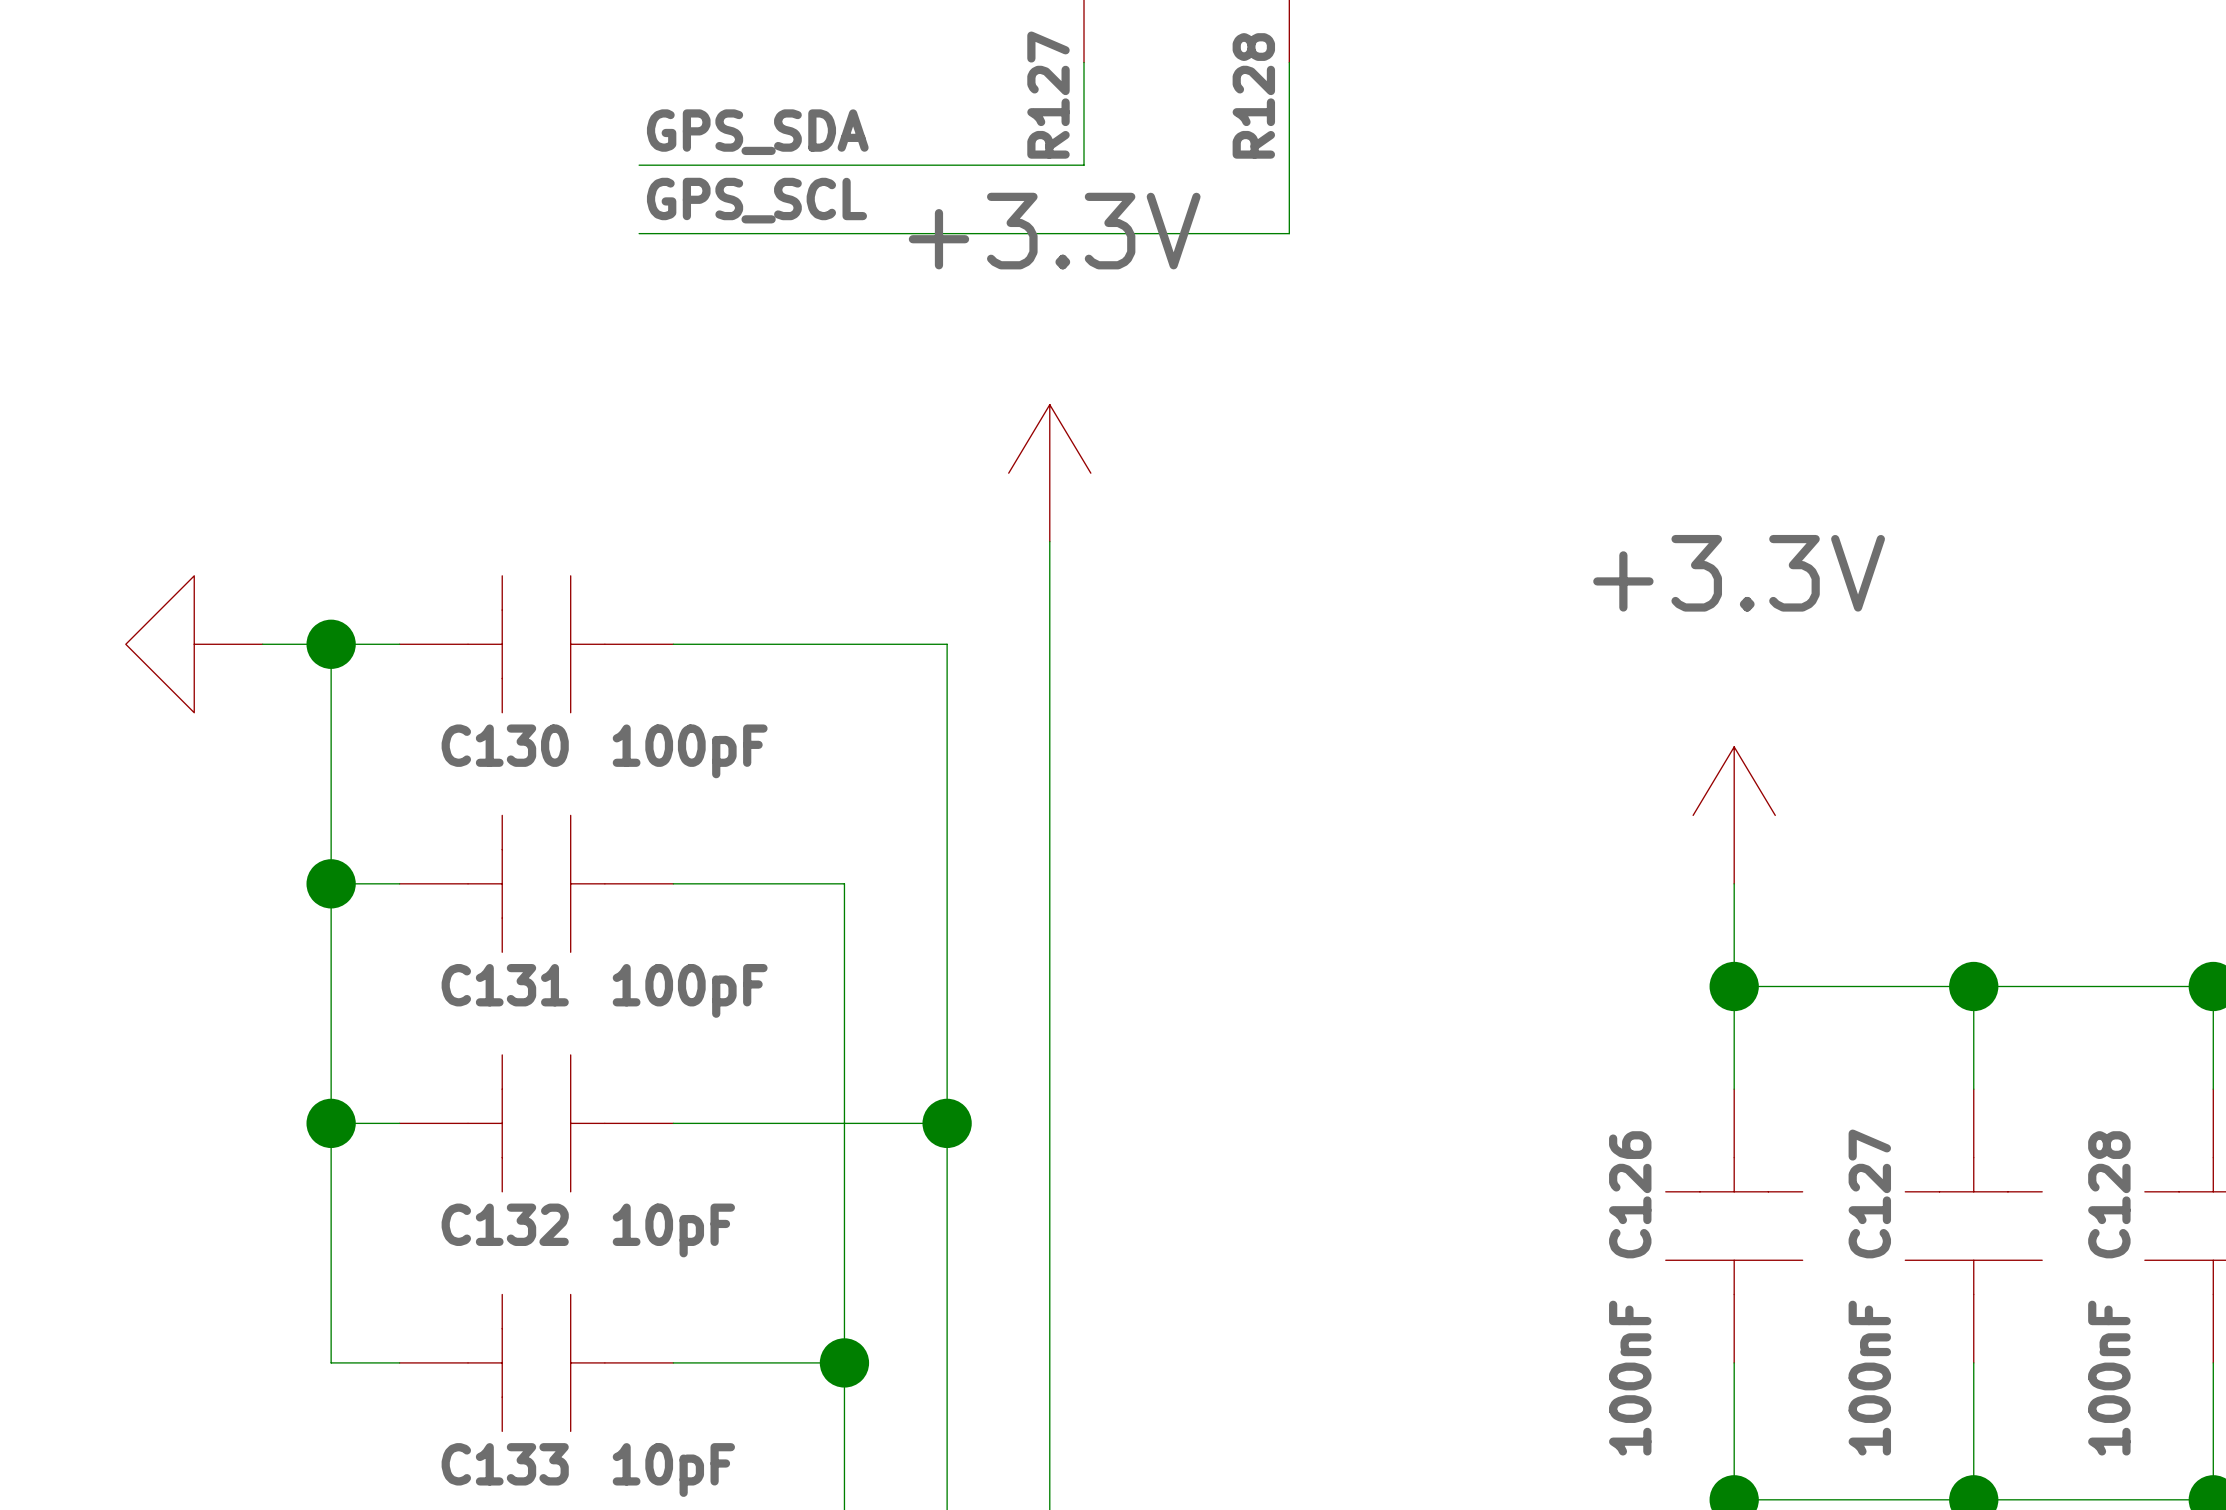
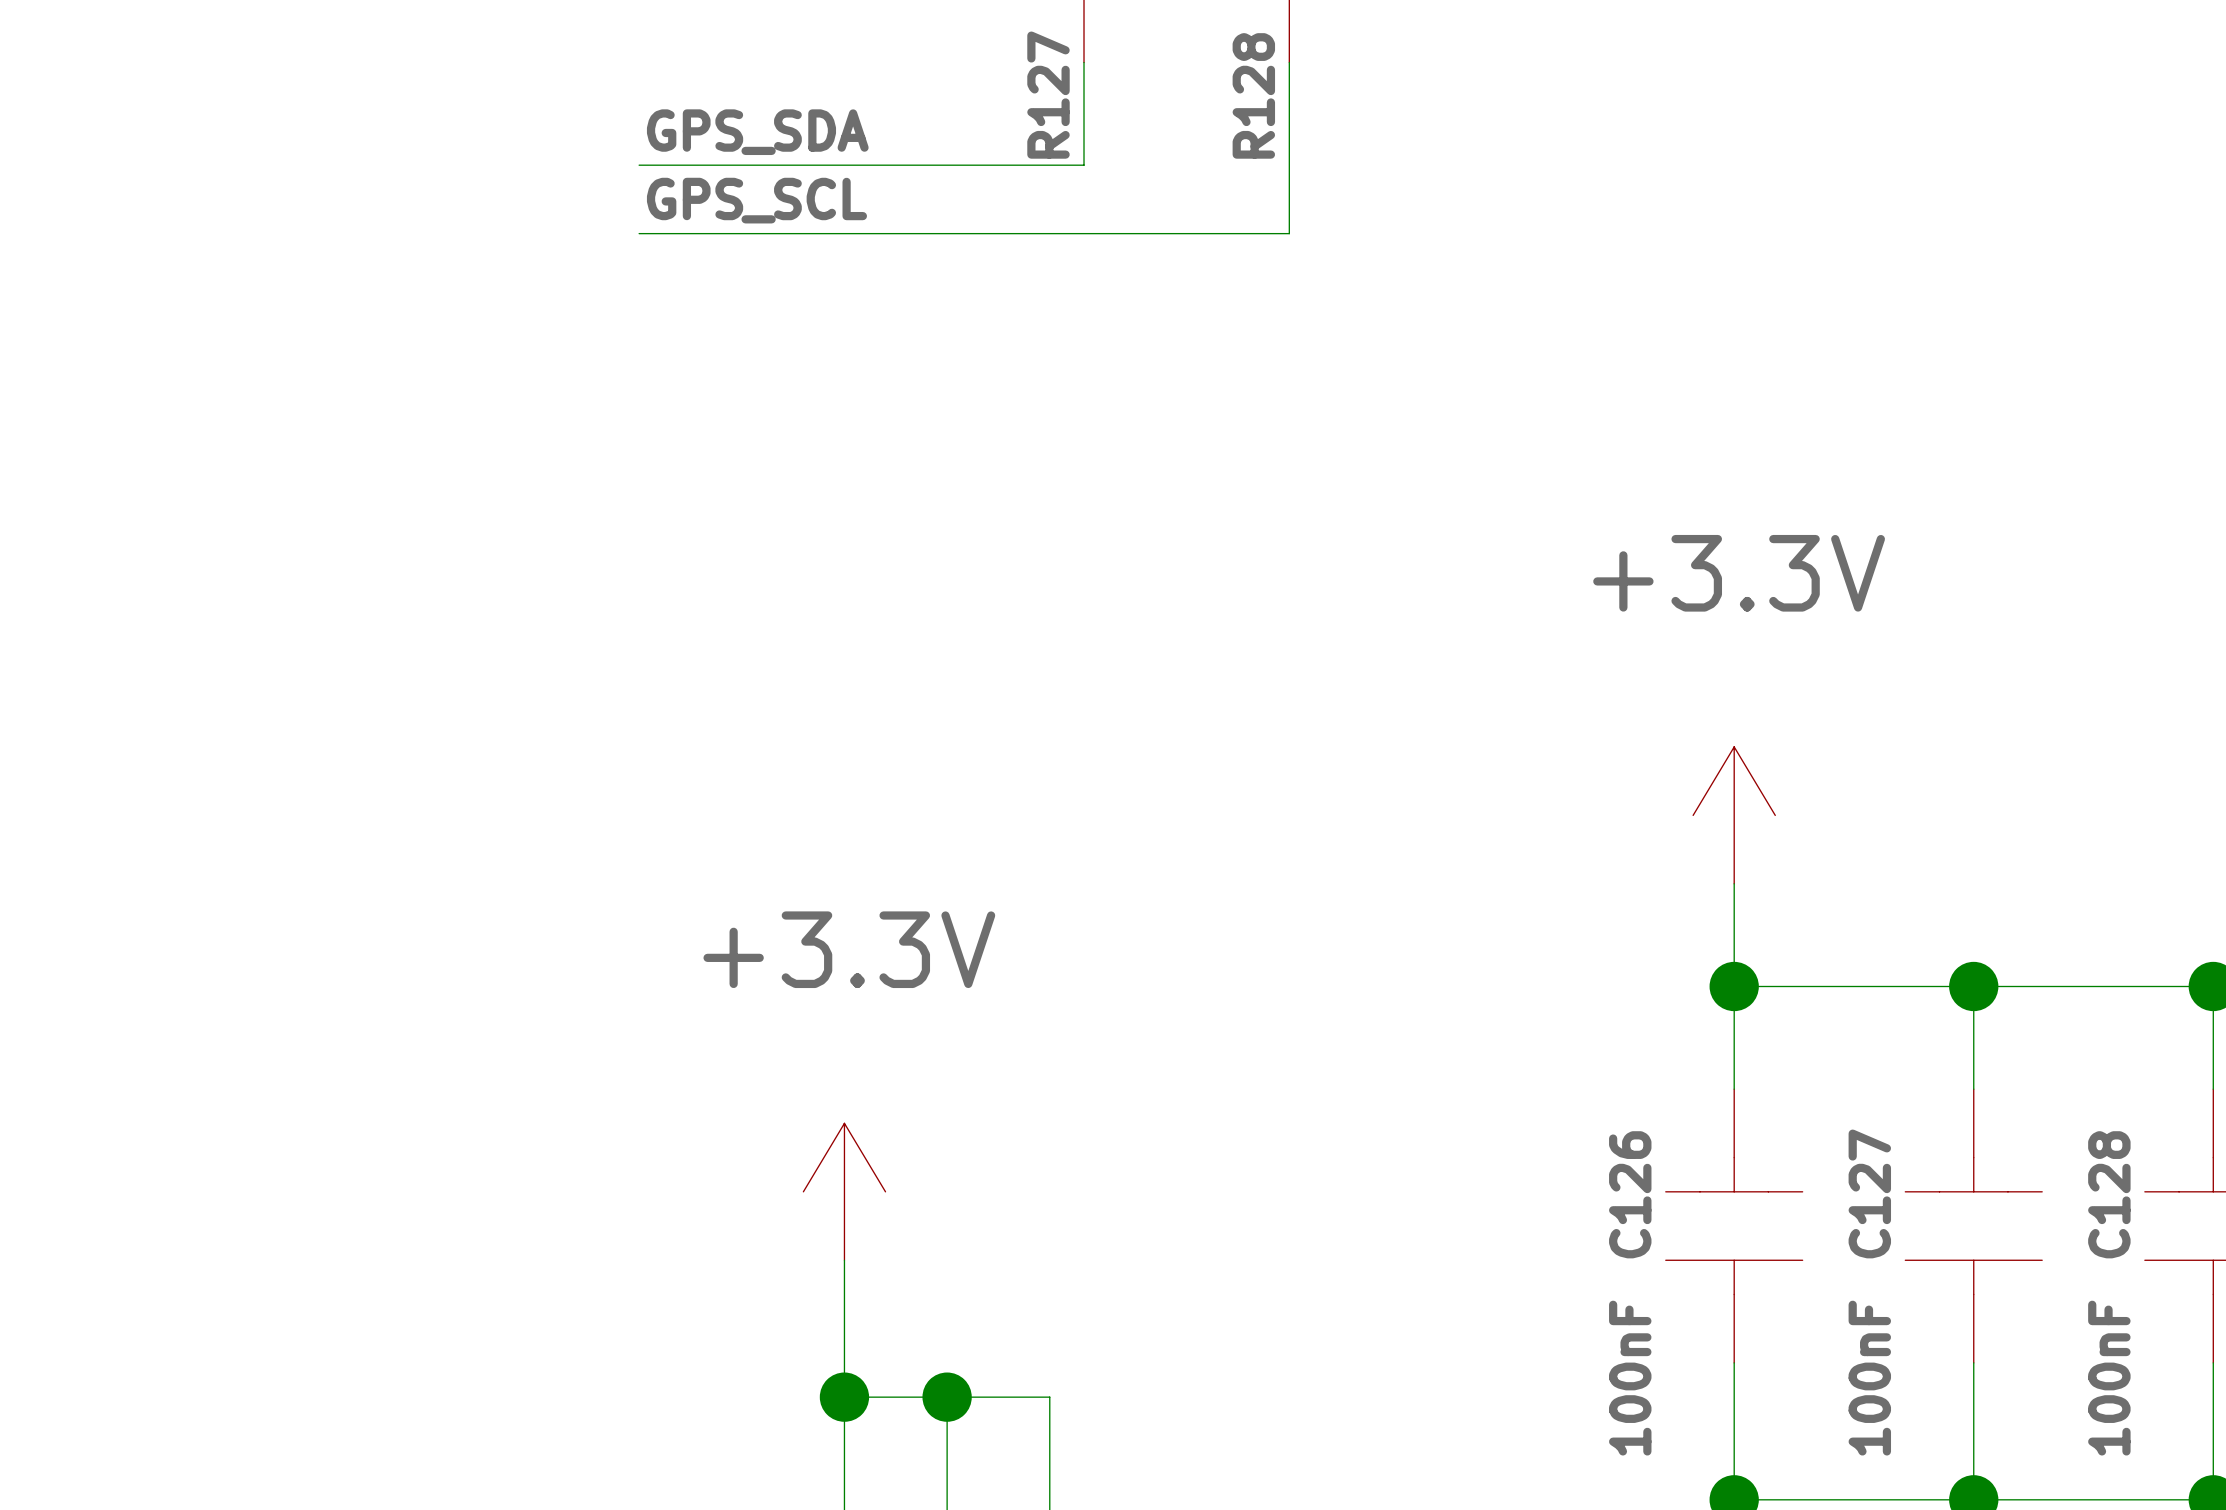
power symbol position: +3.3V (1049, 473) -> +3.3V (844, 1191)
wire: (1049, 541) (1049, 1397) -> (844, 1397) (1049, 1397)
power symbol: (194, 644) -> none
wire: (262, 644) (399, 644) -> none
wire: (331, 644) (331, 1362) (399, 1362) -> none
junction: (331, 644) -> none
C130: 100pF (536, 644) -> none
wire: (673, 644) (947, 644) (947, 1397) -> none
wire: (331, 883) (399, 883) -> none
junction: (331, 883) -> none
C131: 100pF (536, 883) -> none
wire: (673, 883) (844, 883) (844, 1260) -> none
wire: (331, 1123) (399, 1123) -> none
junction: (331, 1123) -> none
C132: 10pF (536, 1123) -> none
wire: (673, 1123) (947, 1123) -> none
junction: (947, 1123) -> none
C133: 10pF (536, 1362) -> none
wire: (673, 1362) (844, 1362) -> none
junction position: (844, 1362) -> (844, 1397)
junction: none -> (947, 1397)

